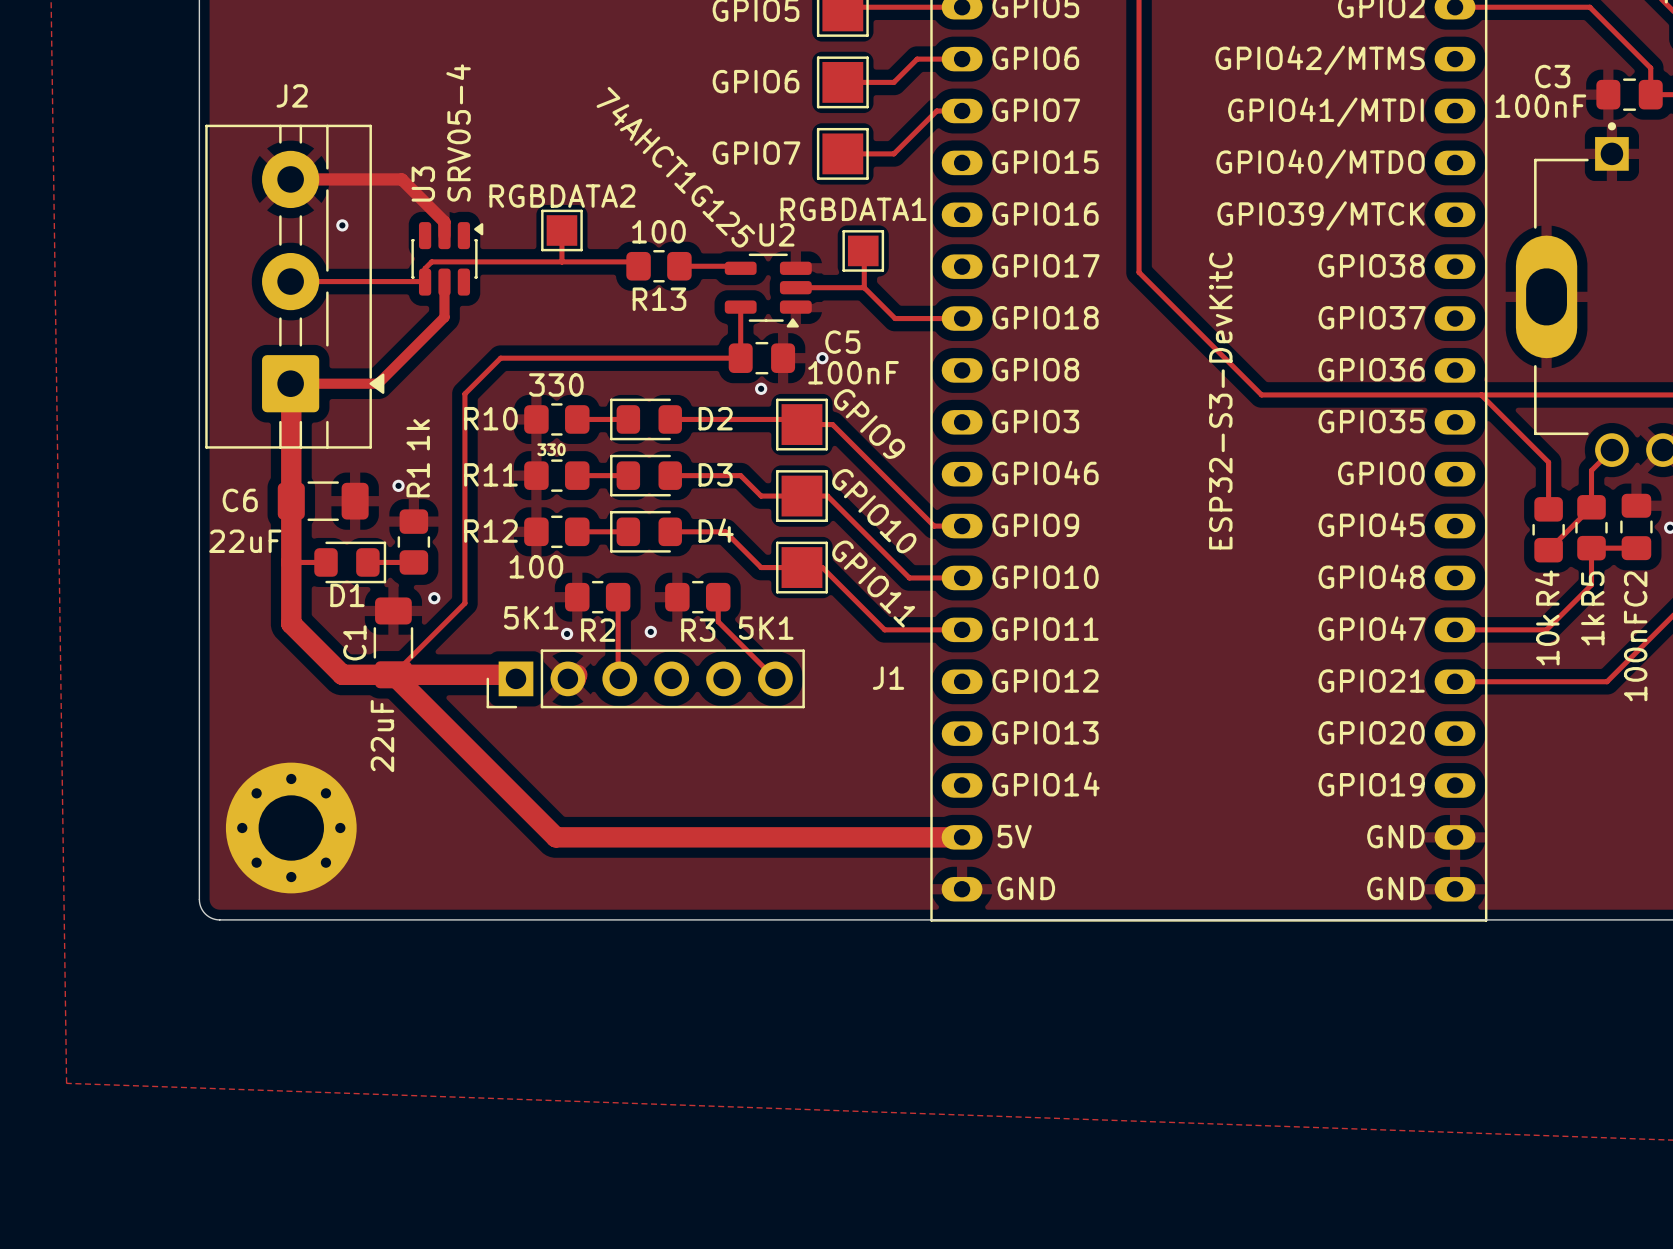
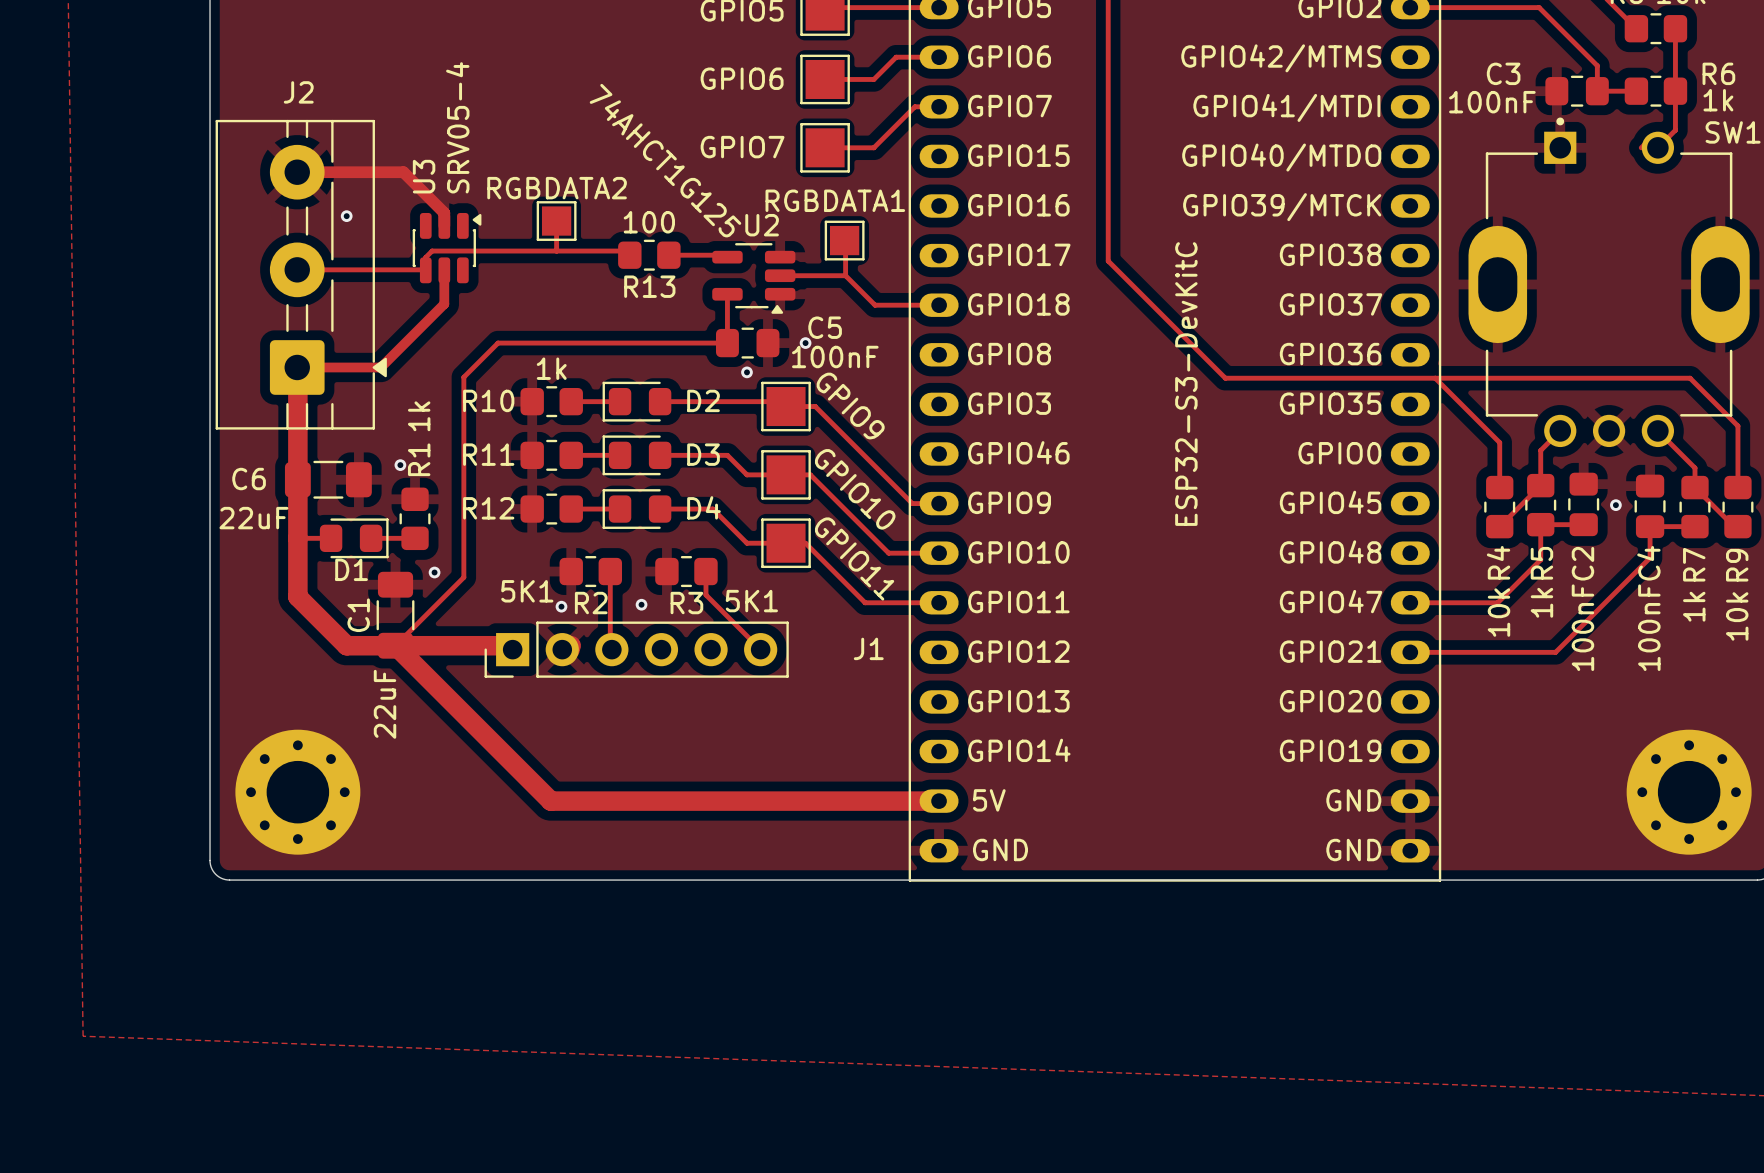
R10 value: 330 (556, 384) -> 1k (551, 368)
R11 value: 330 (551, 449) -> none
R12 value: 100 (536, 566) -> none

